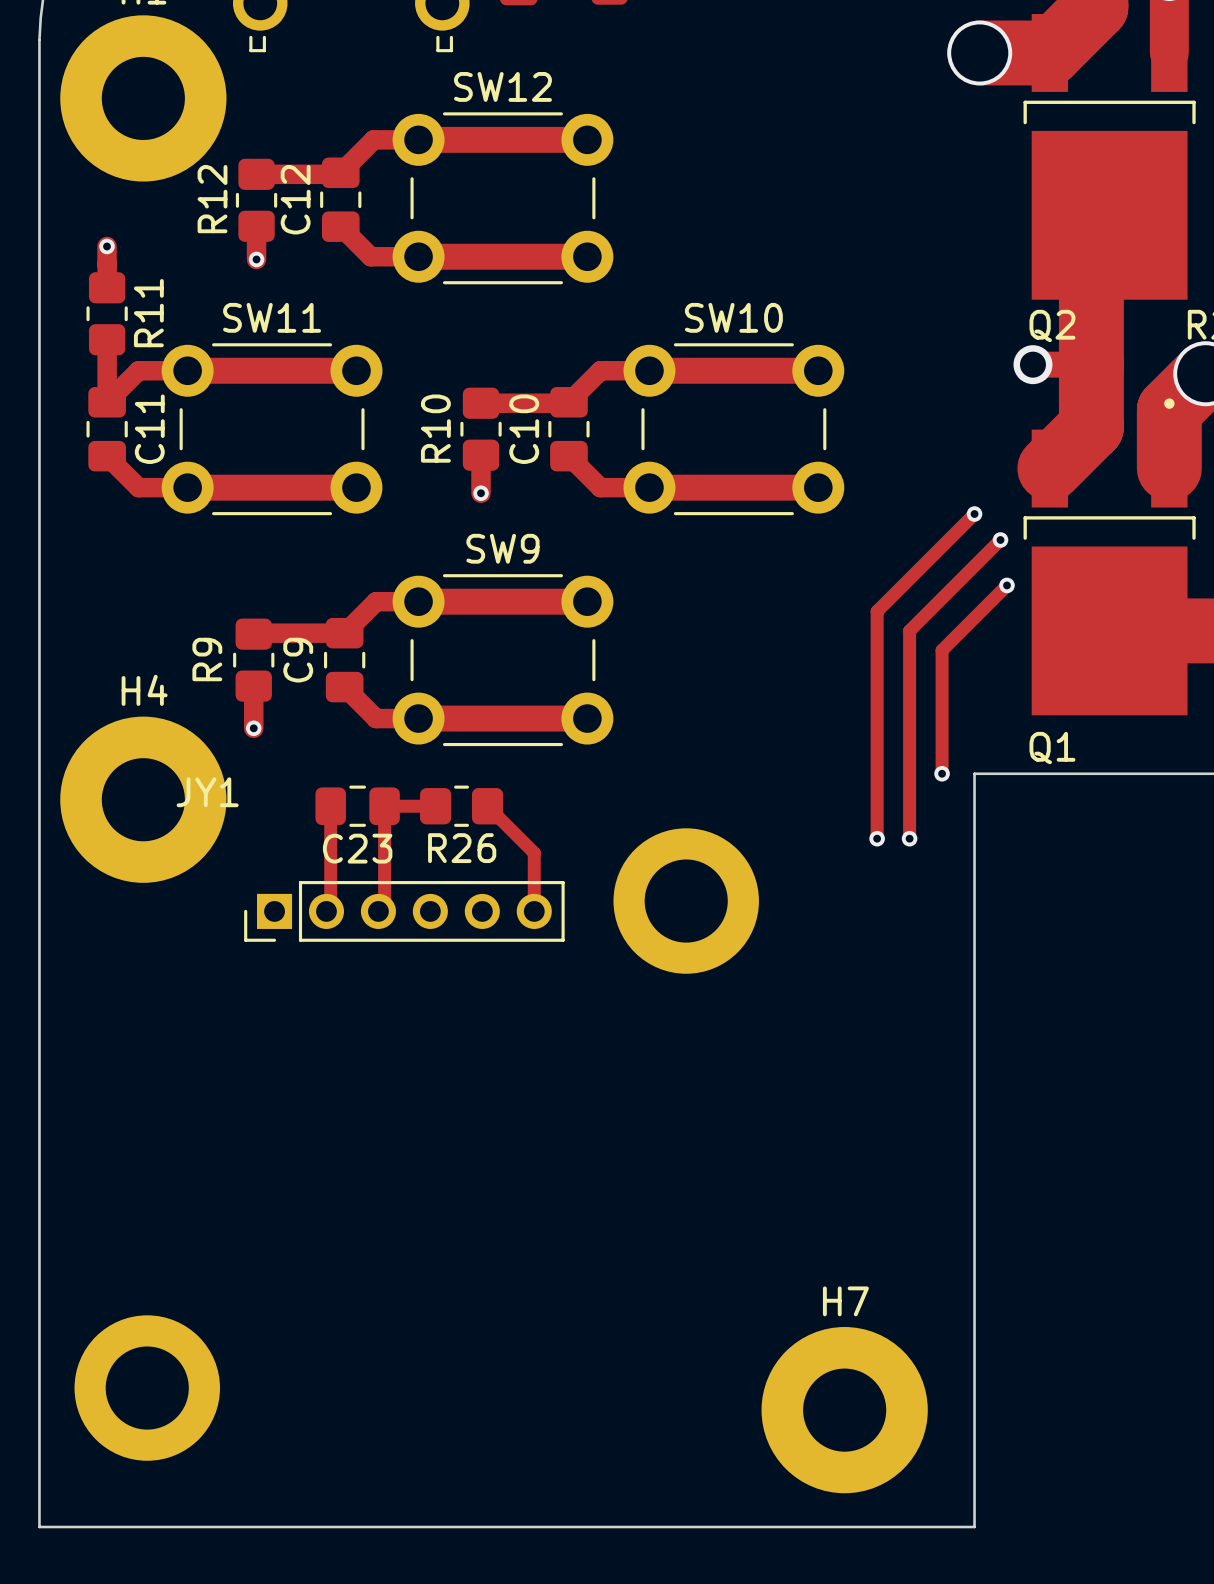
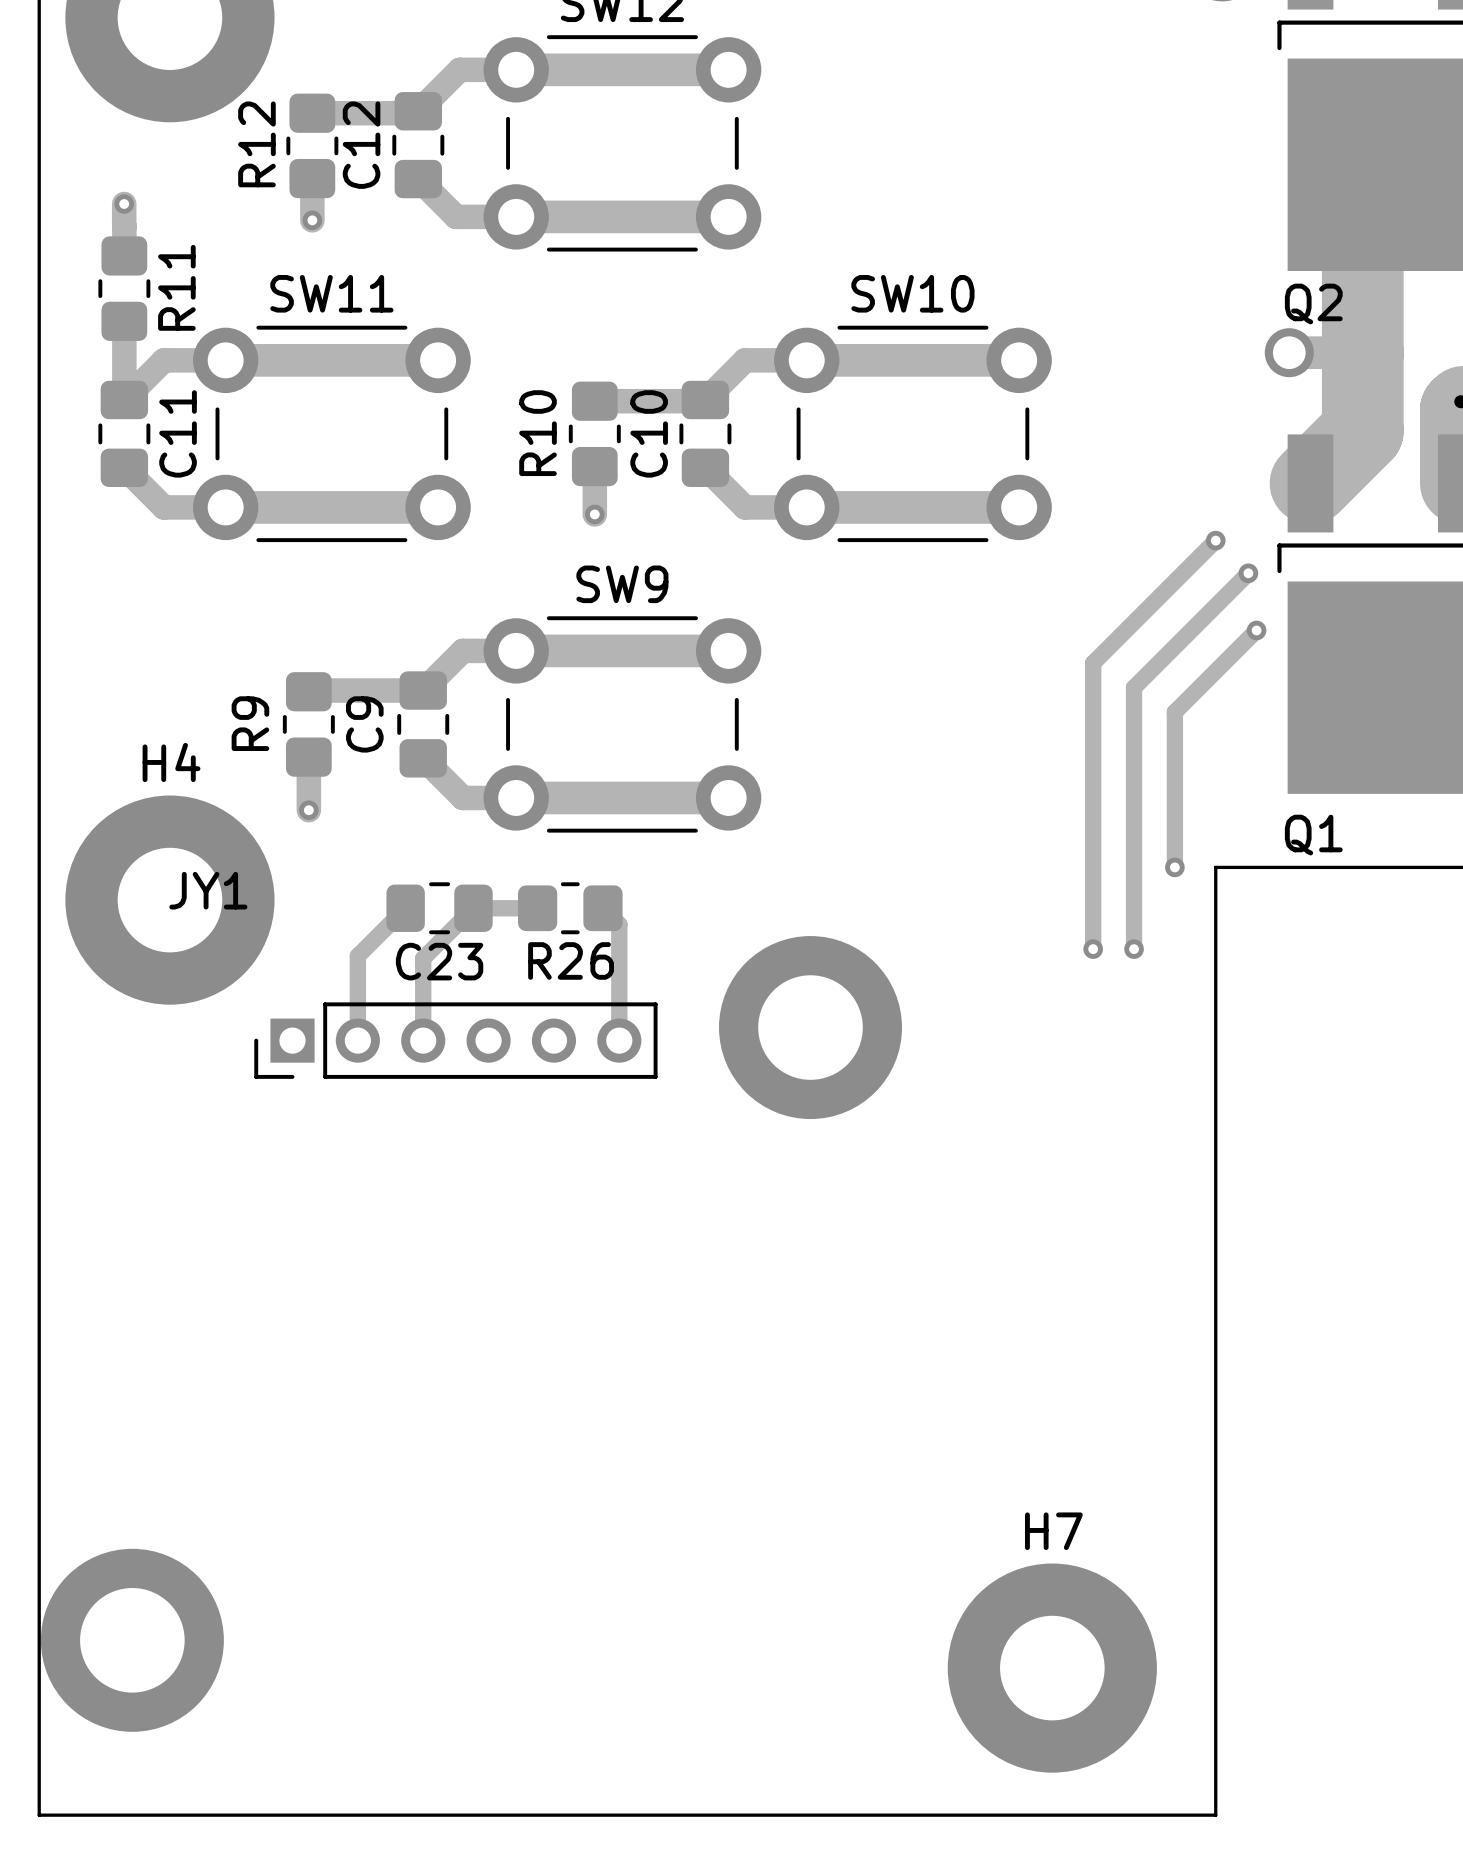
track: (330, 806) (330, 907) (326, 911) -> (405, 908) (357, 956) (357, 1040)
track: (384, 806) (384, 905) (378, 911) -> (473, 908) (423, 958) (423, 1040)
track: (500, 819) (534, 852) (534, 911) -> (619, 924) (619, 1040)
JY1 position: (416, 1144) -> (471, 1333)

